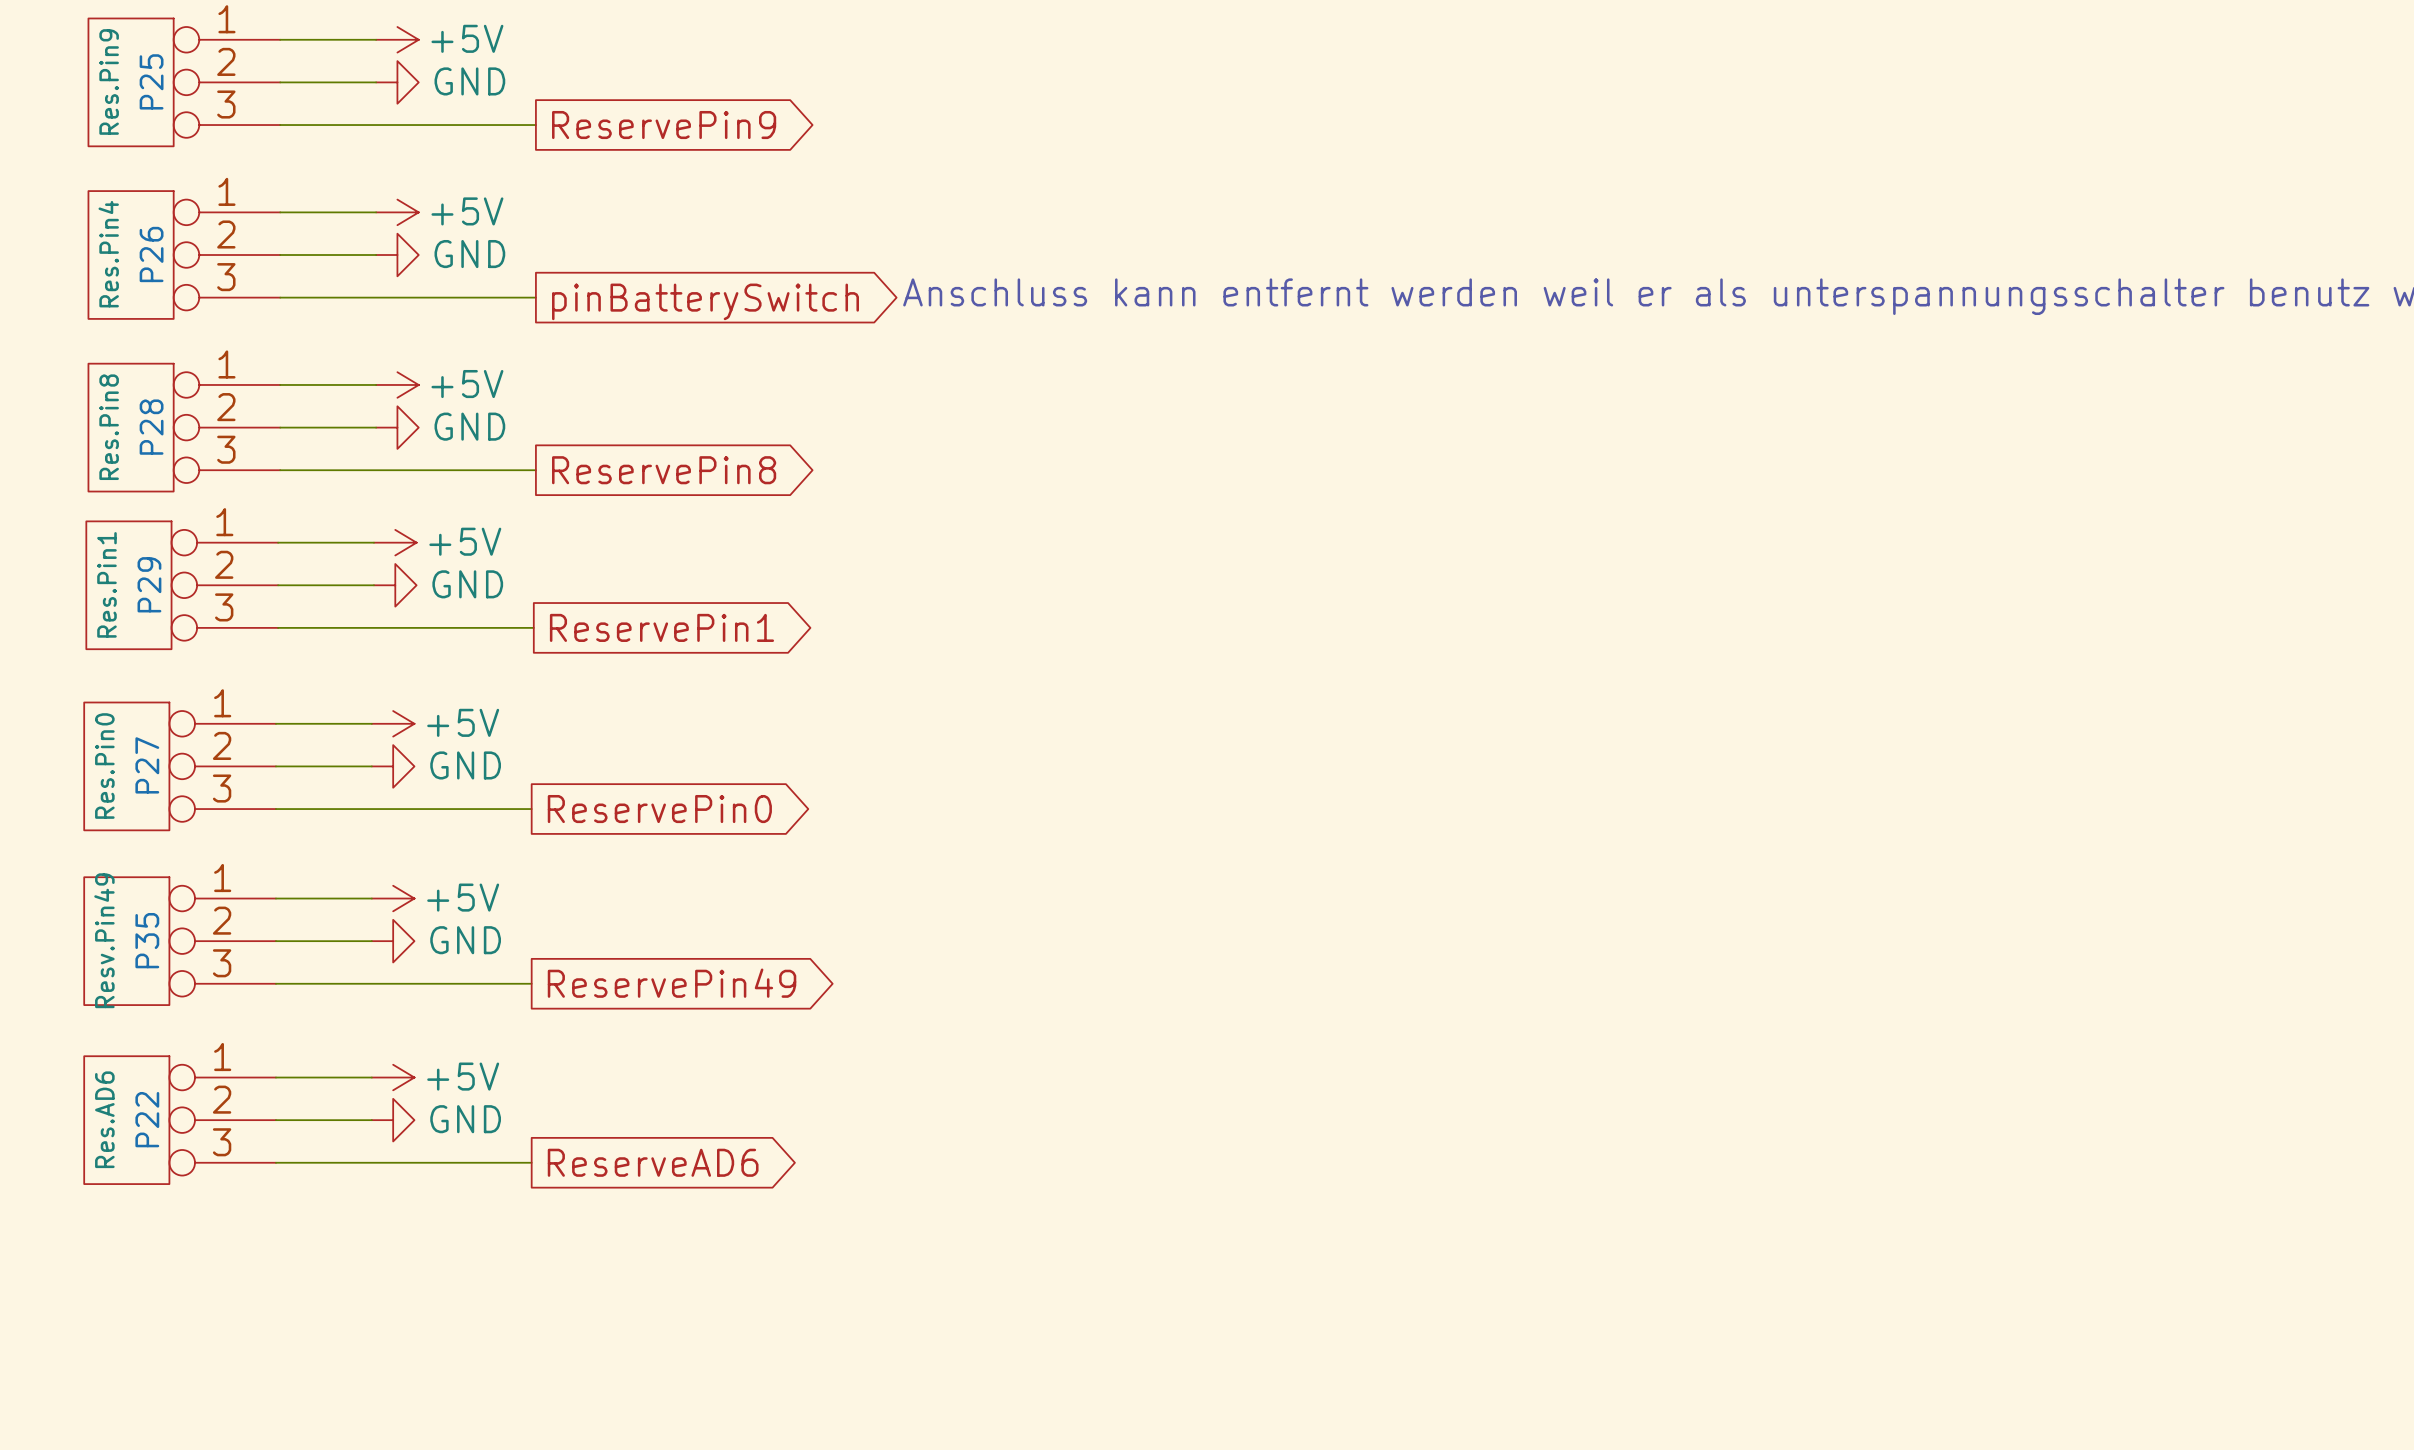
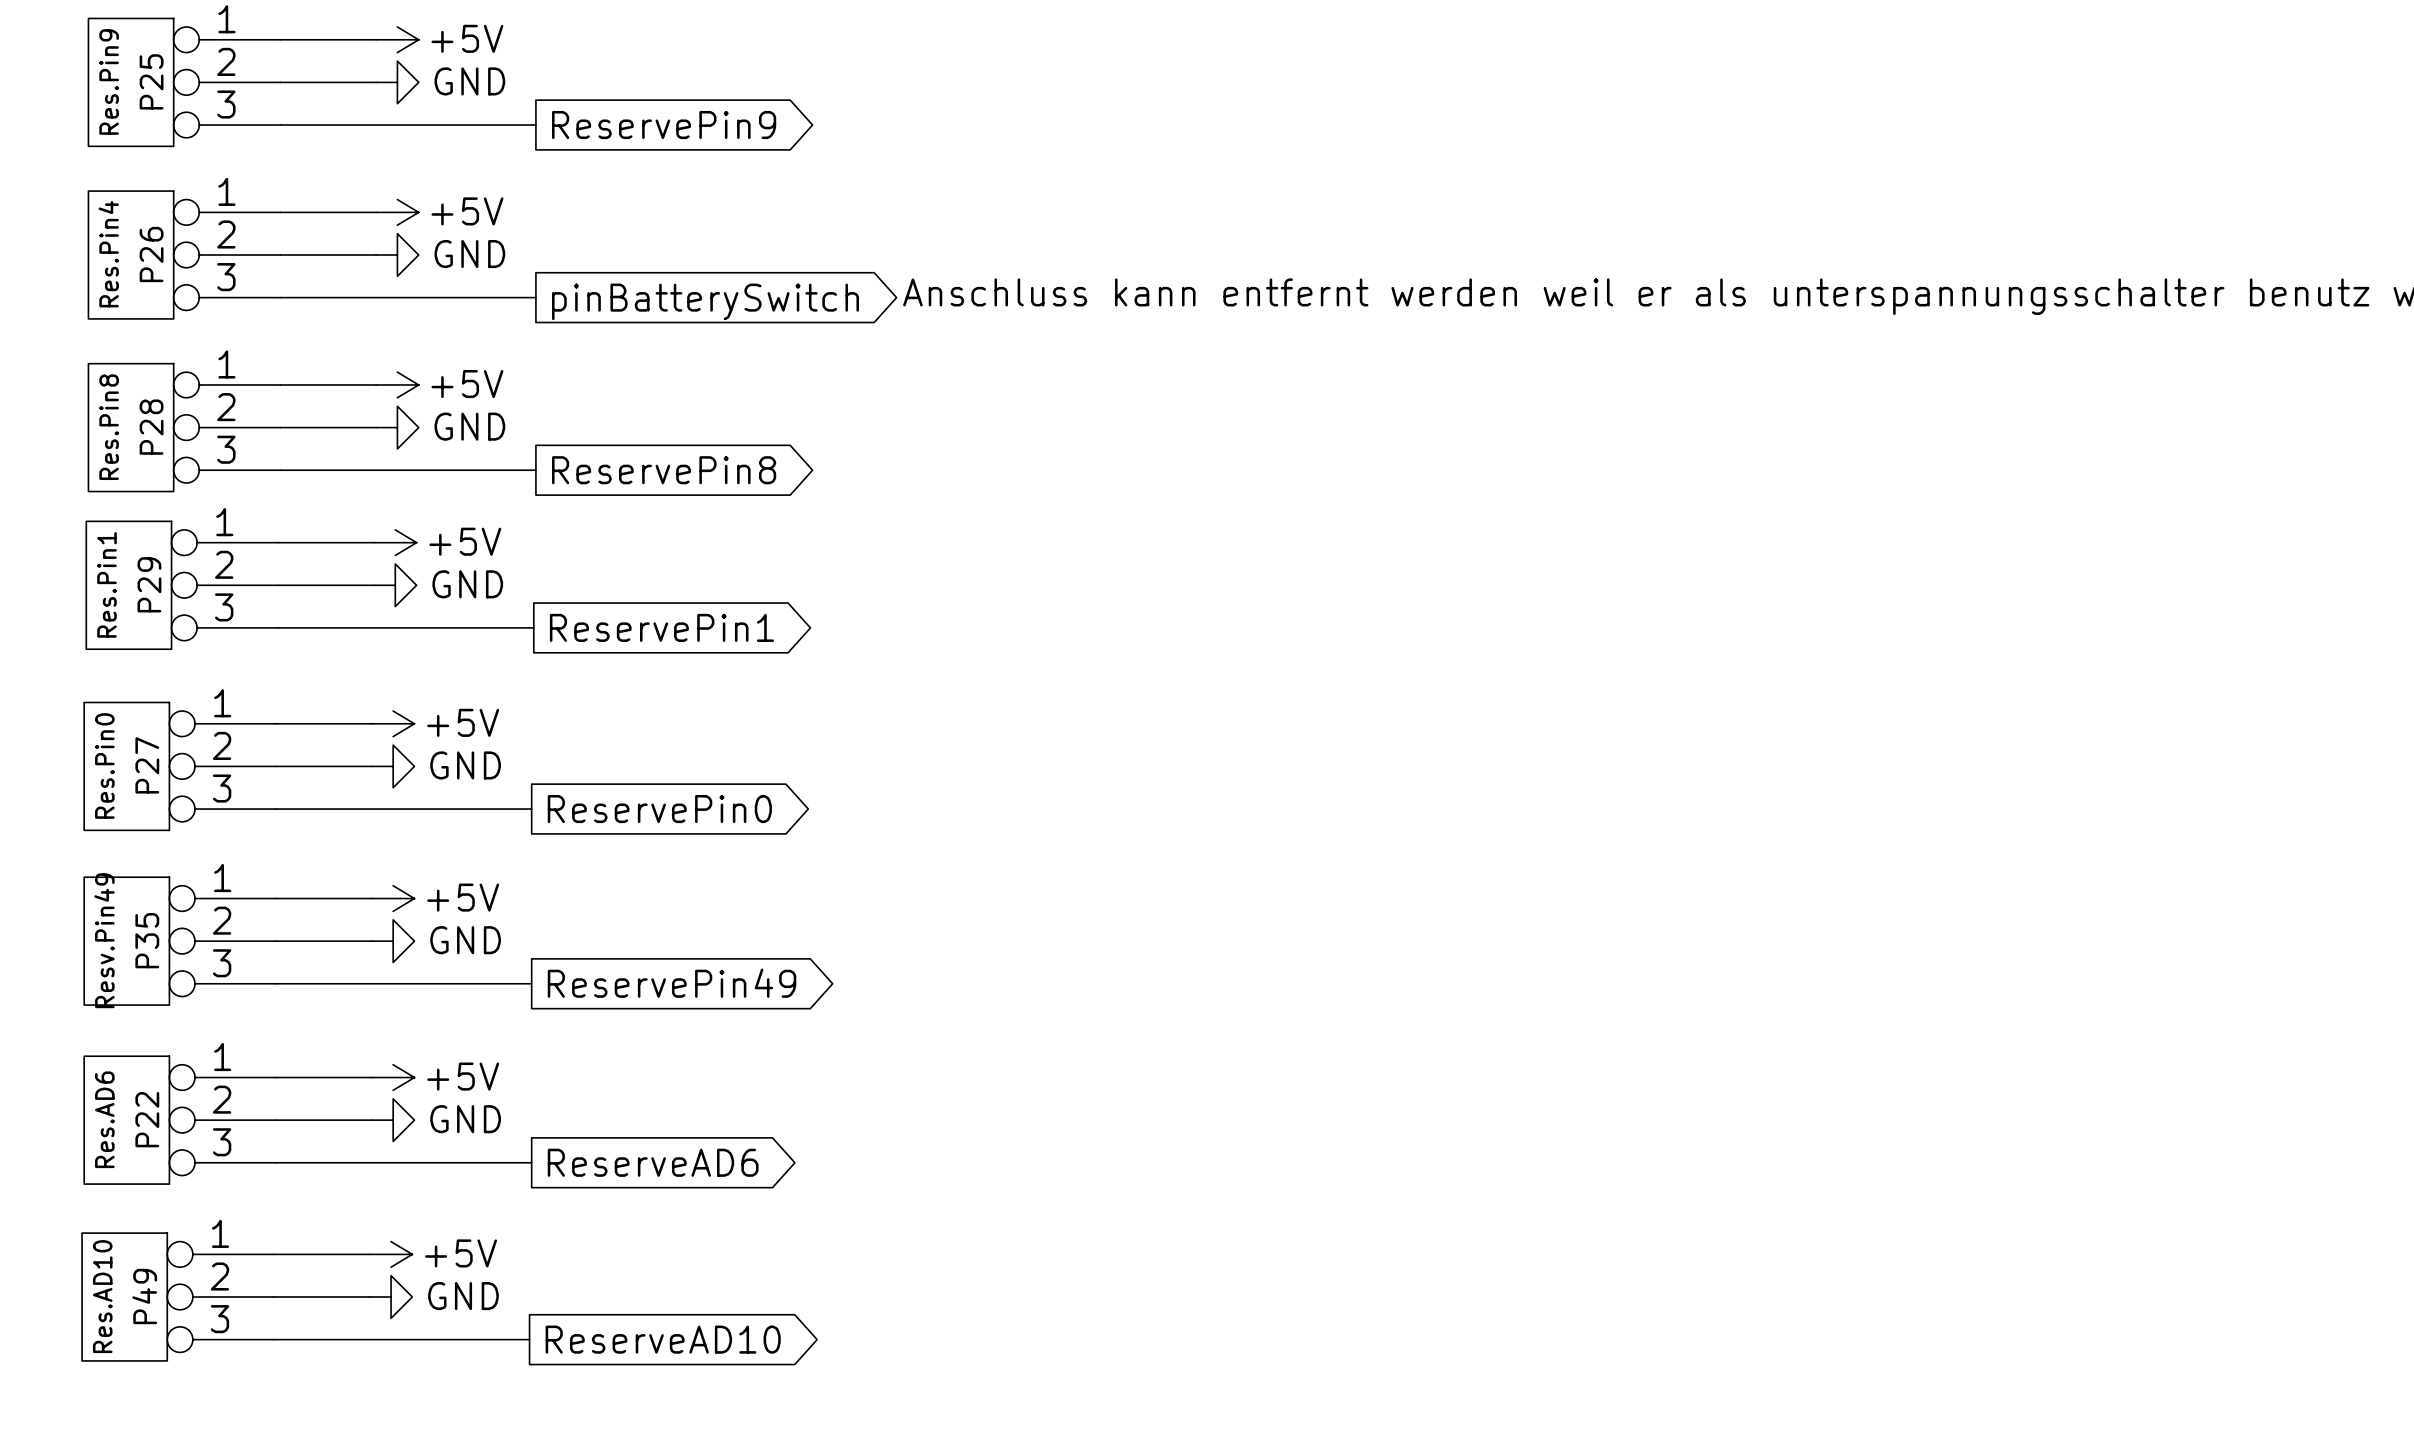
wire: none -> (273, 1254) (369, 1254)
power symbol: none -> +5V (391, 1254)
P49: none -> Res.AD10 (177, 1297)
wire: none -> (273, 1297) (369, 1297)
power symbol: none -> GND (391, 1297)
wire: none -> (273, 1339) (529, 1339)
global label: none -> ReserveAD10 (663, 1339)

